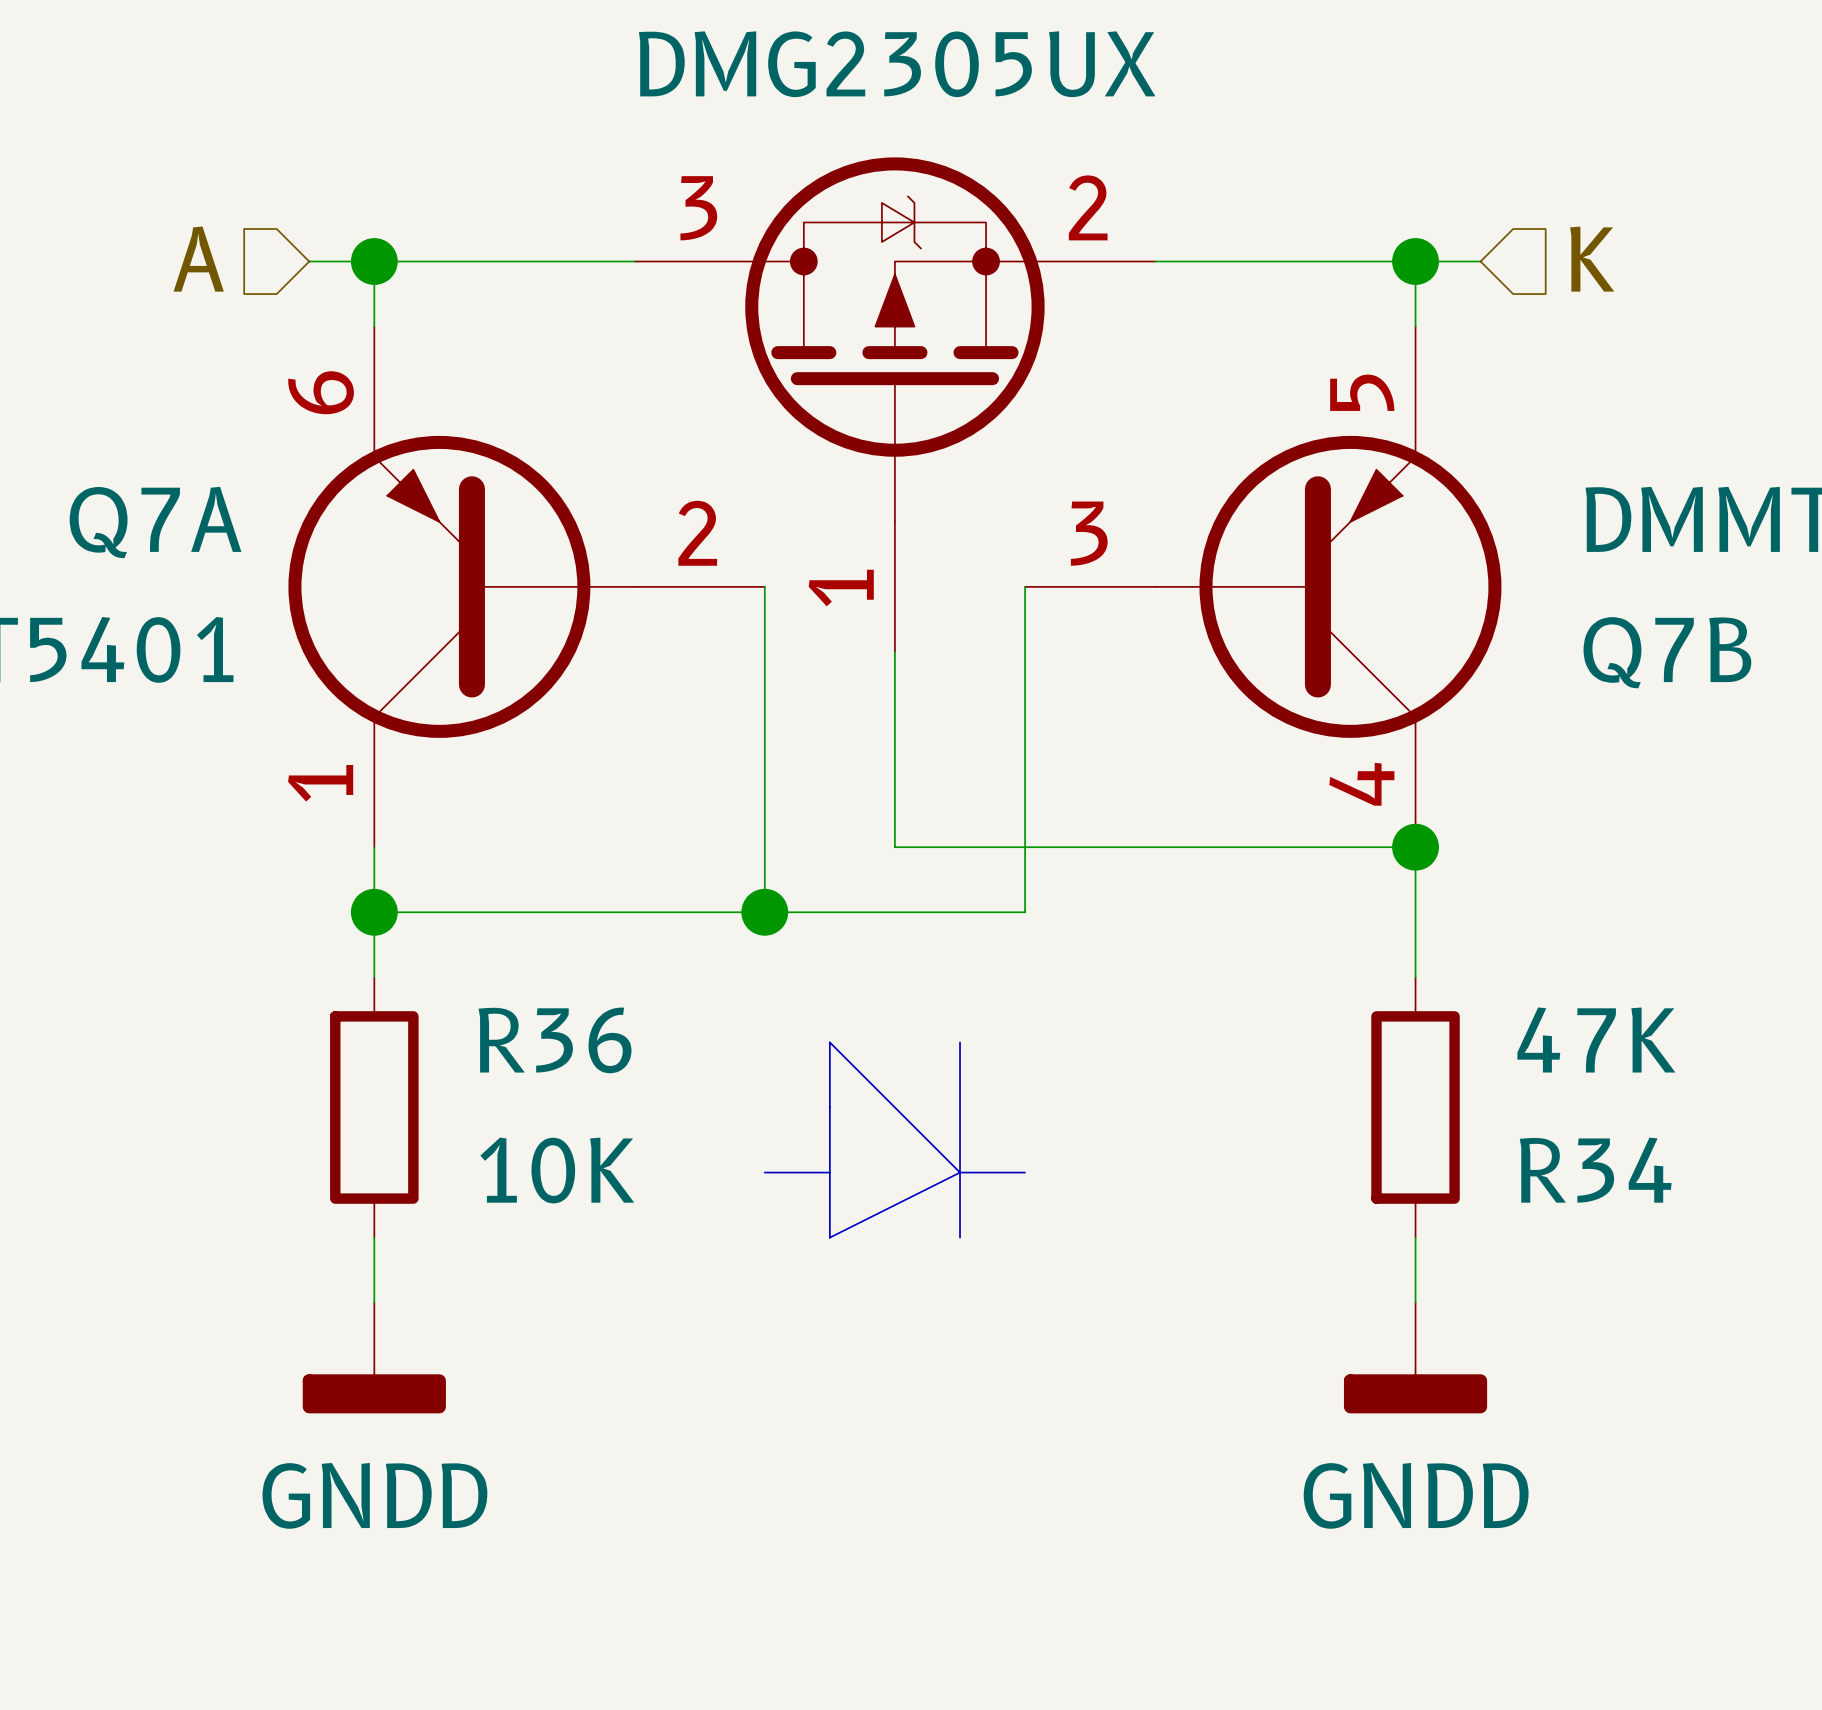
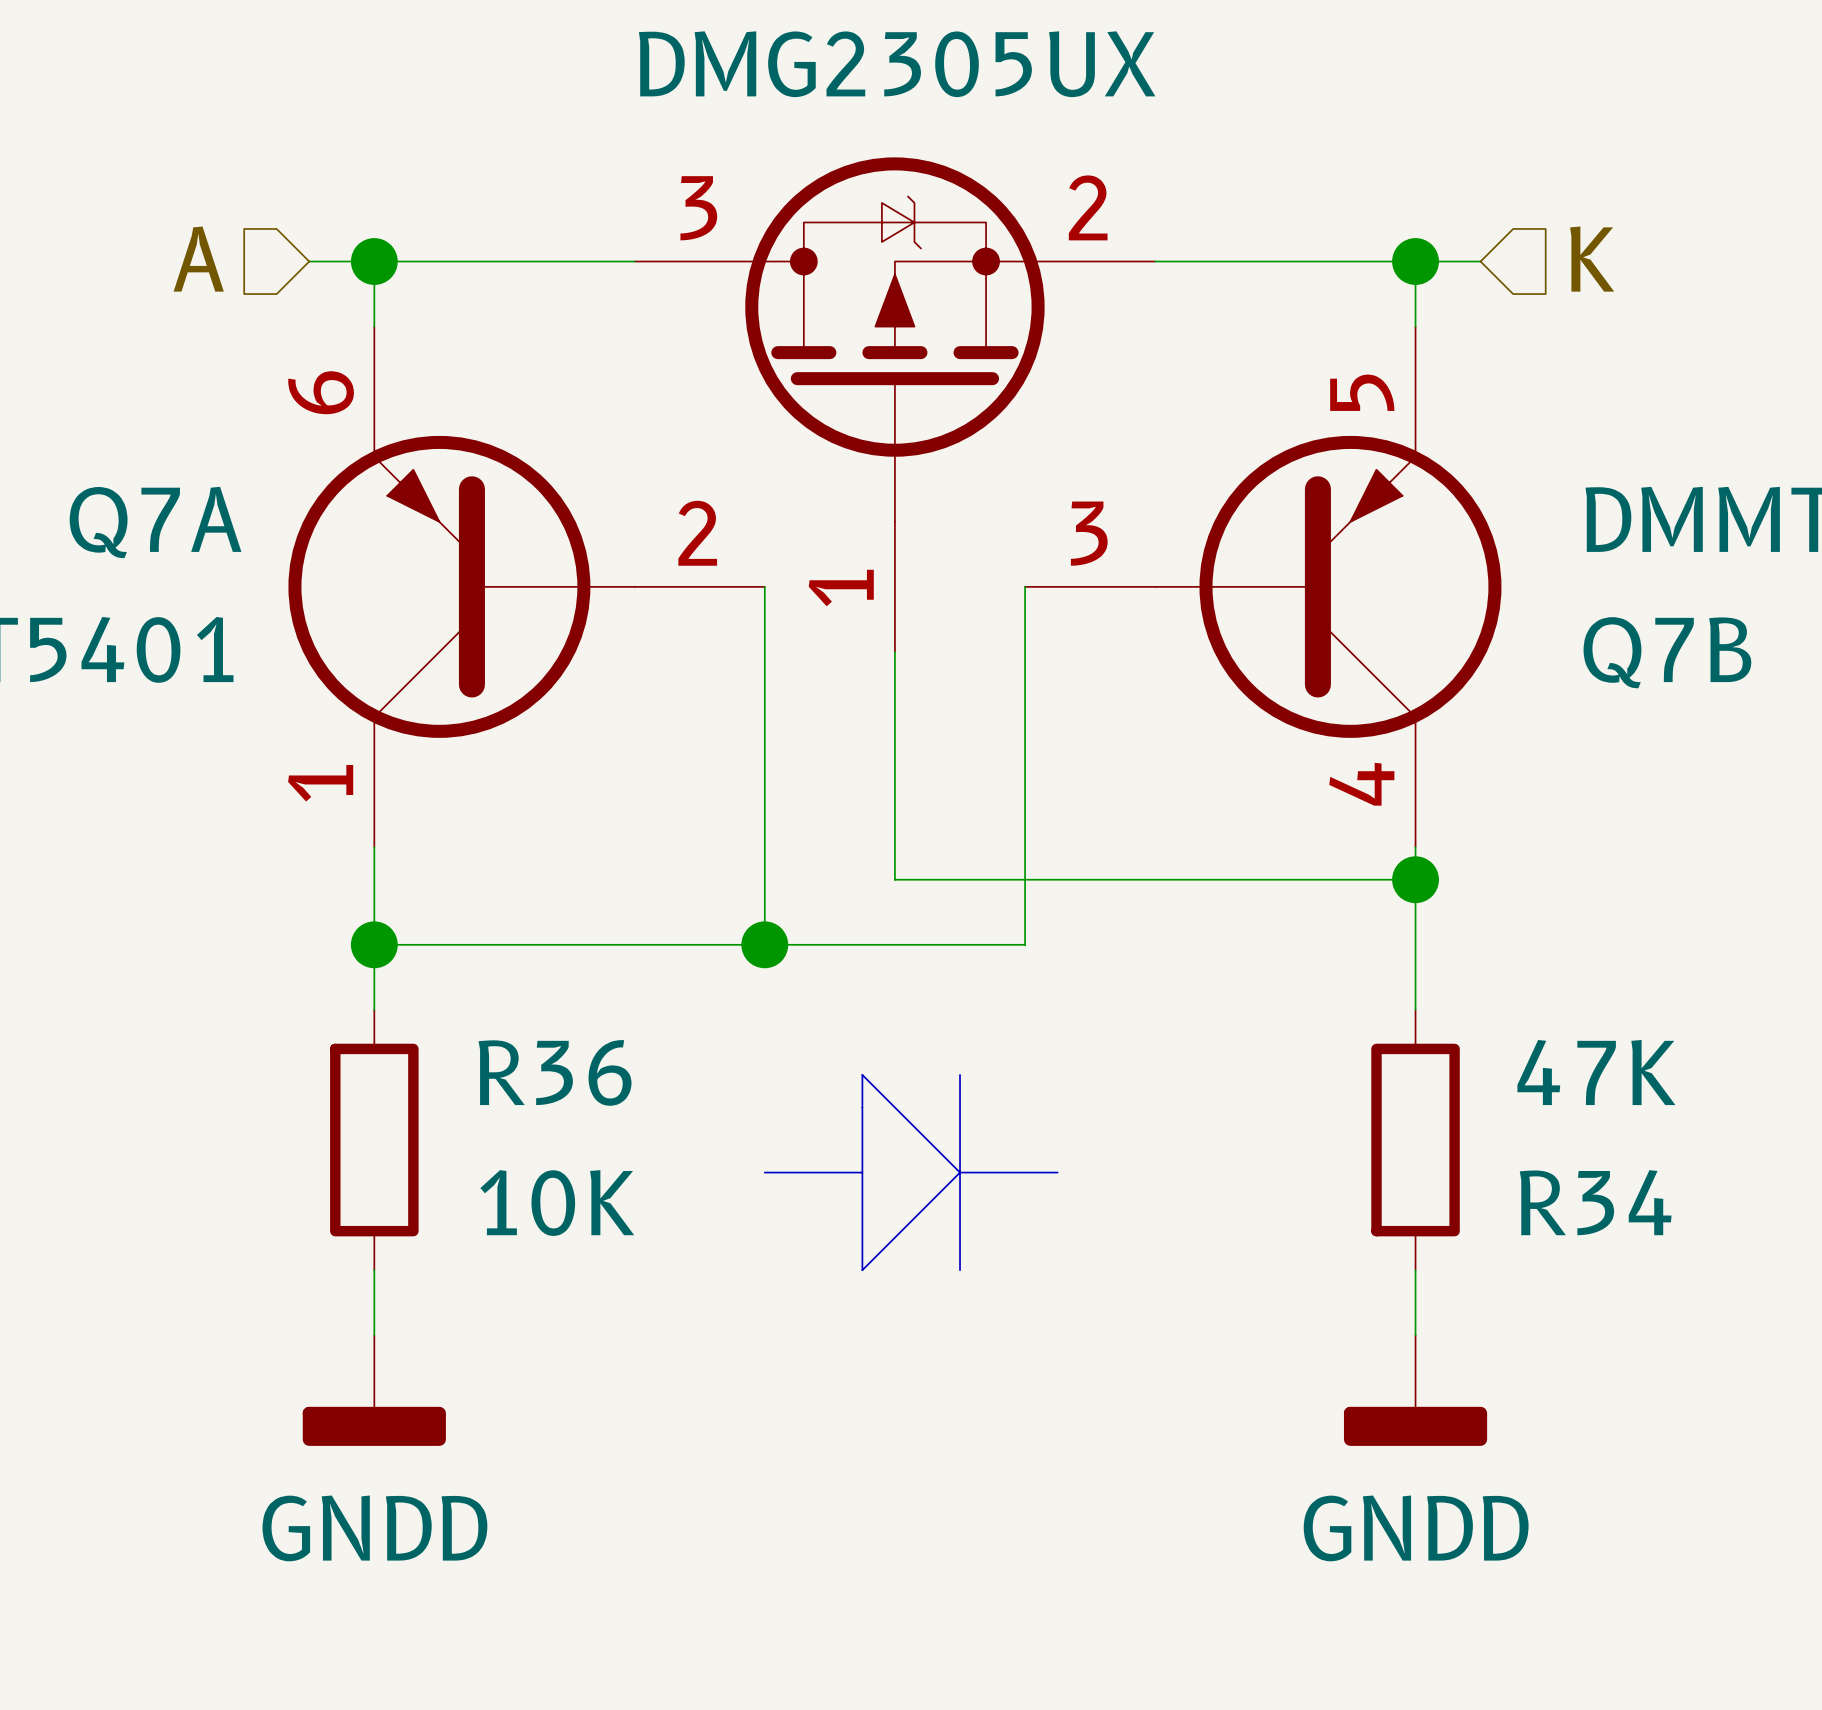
wire: (894, 847) (1415, 847) -> (894, 847) (894, 879) (1415, 879)
junction position: (1415, 847) -> (1415, 879)
wire: (374, 912) (1025, 912) -> (374, 944) (1025, 944) (1025, 912)
junction position: (374, 912) -> (374, 944)
junction position: (764, 912) -> (764, 944)
line: (960, 1042) (960, 1074) -> (960, 1237) (960, 1270)
line: (862, 1074) (829, 1042) (829, 1237) (960, 1172) -> (862, 1074) (862, 1270) (960, 1172)
R36 position: (374, 1107) -> (374, 1140)
R34 position: (1415, 1107) -> (1415, 1140)
line: none -> (829, 1172) (862, 1172)
line: none -> (1025, 1172) (1057, 1172)
power symbol position: GNDD (374, 1358) -> GNDD (374, 1390)
power symbol position: GNDD (1415, 1358) -> GNDD (1415, 1390)

